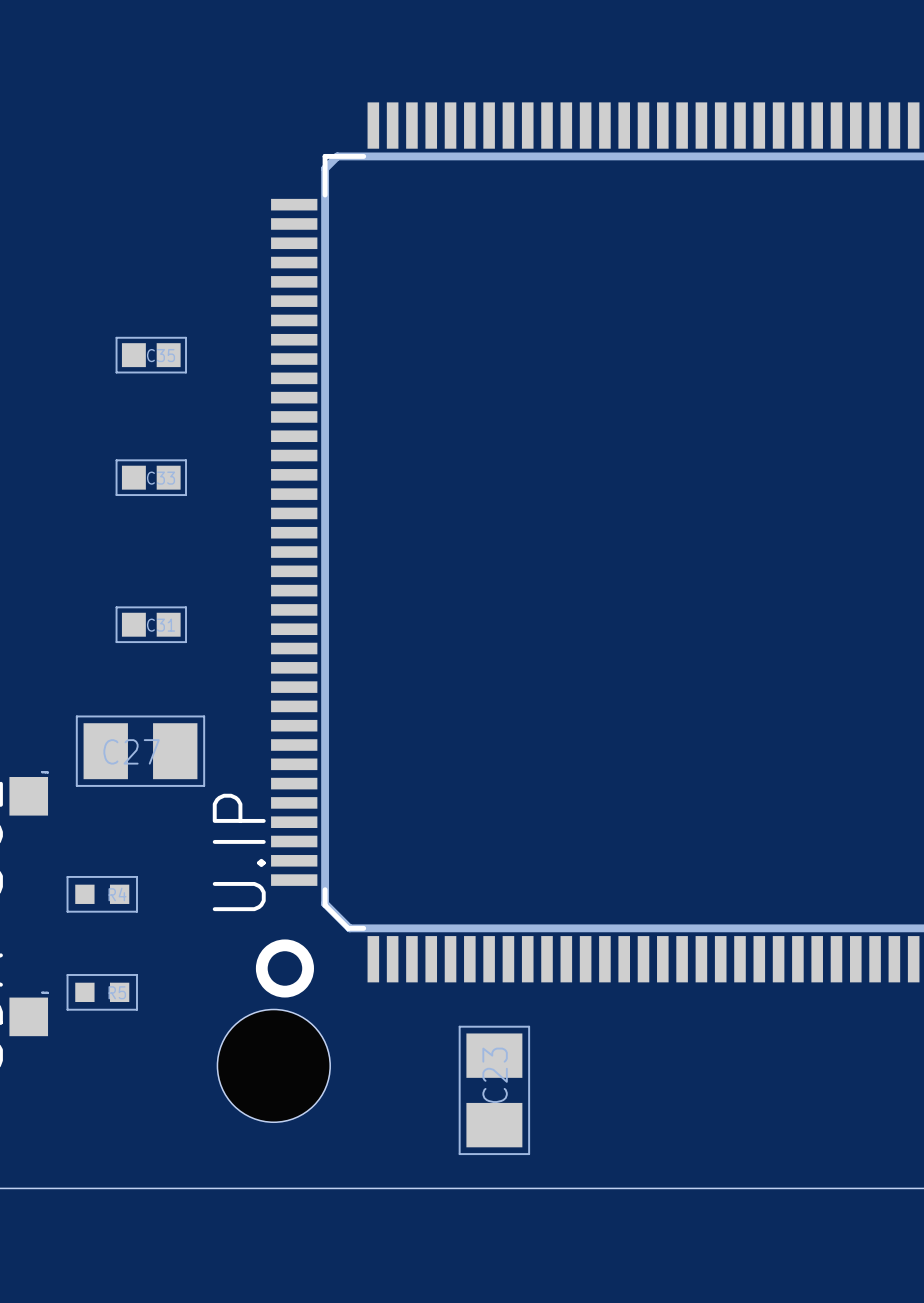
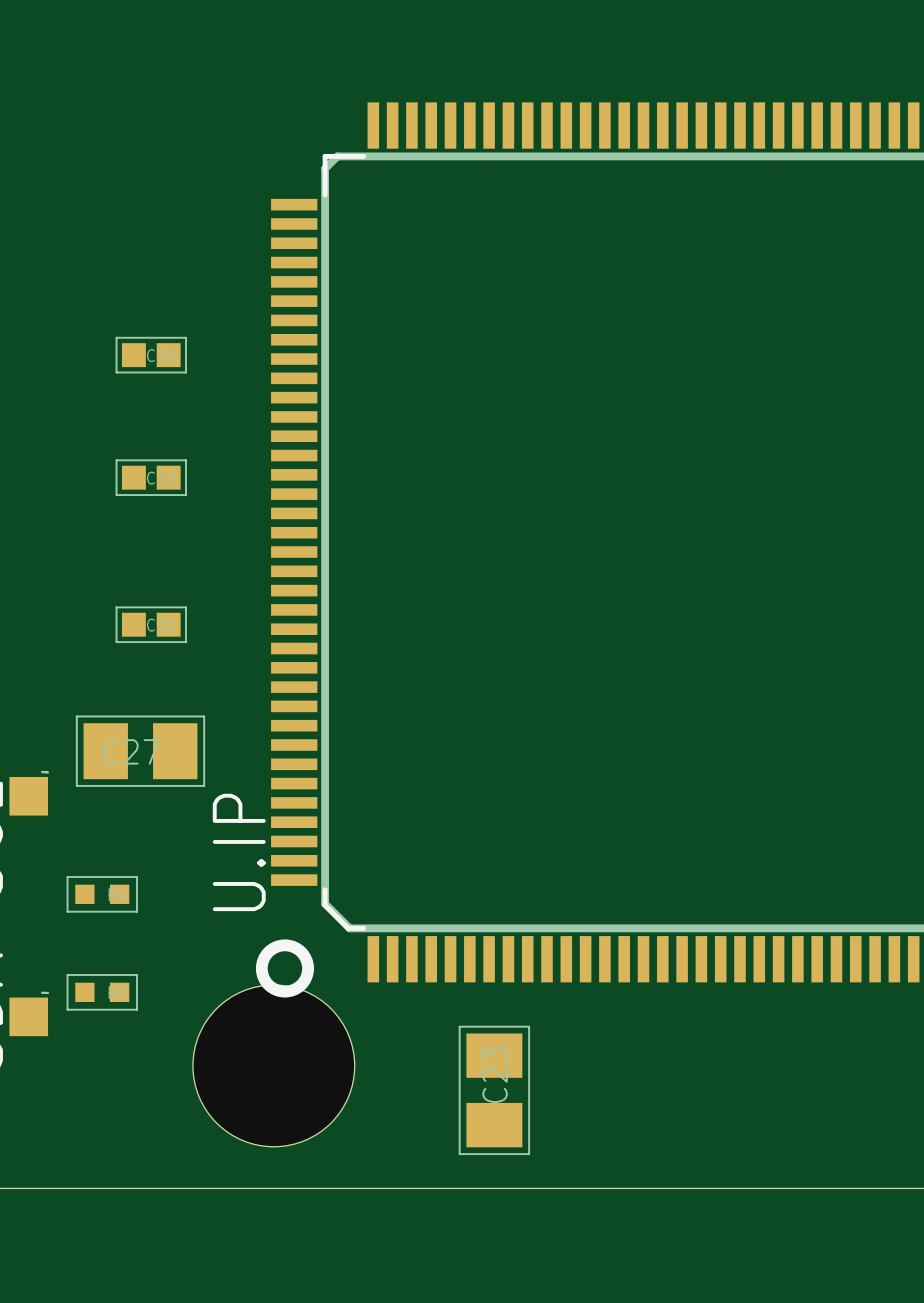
hole size: [217, 1009, 331, 1123] -> [192, 985, 355, 1147]

